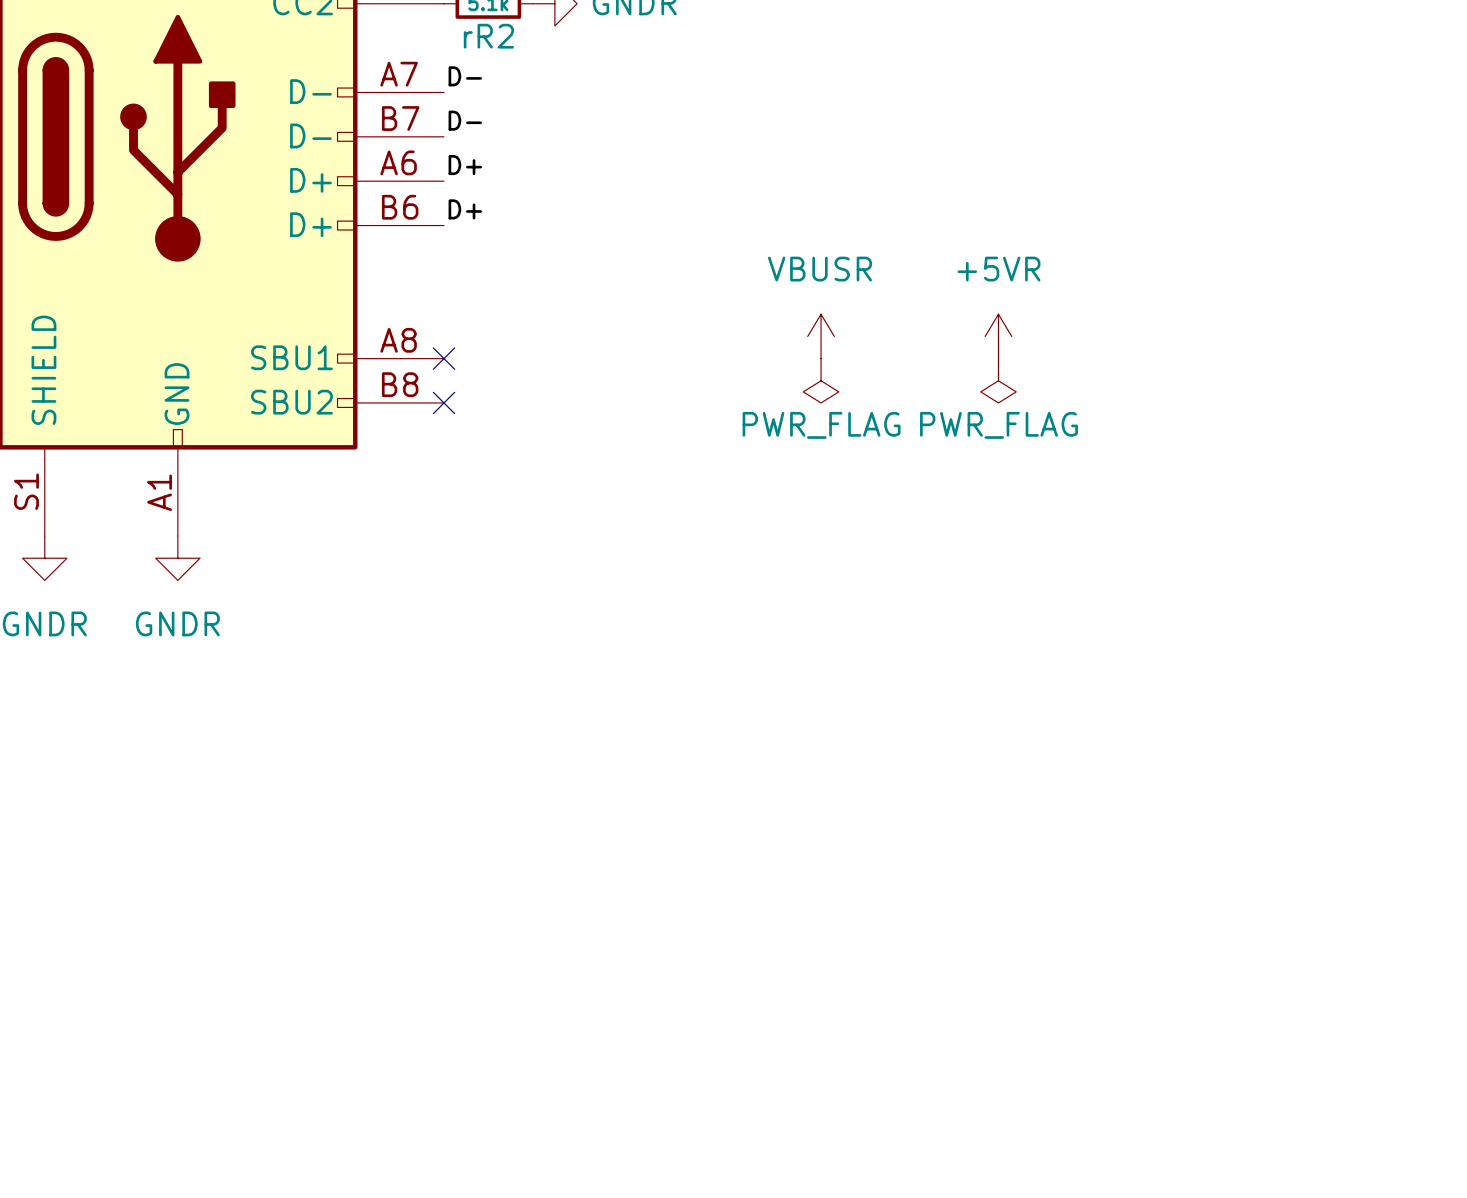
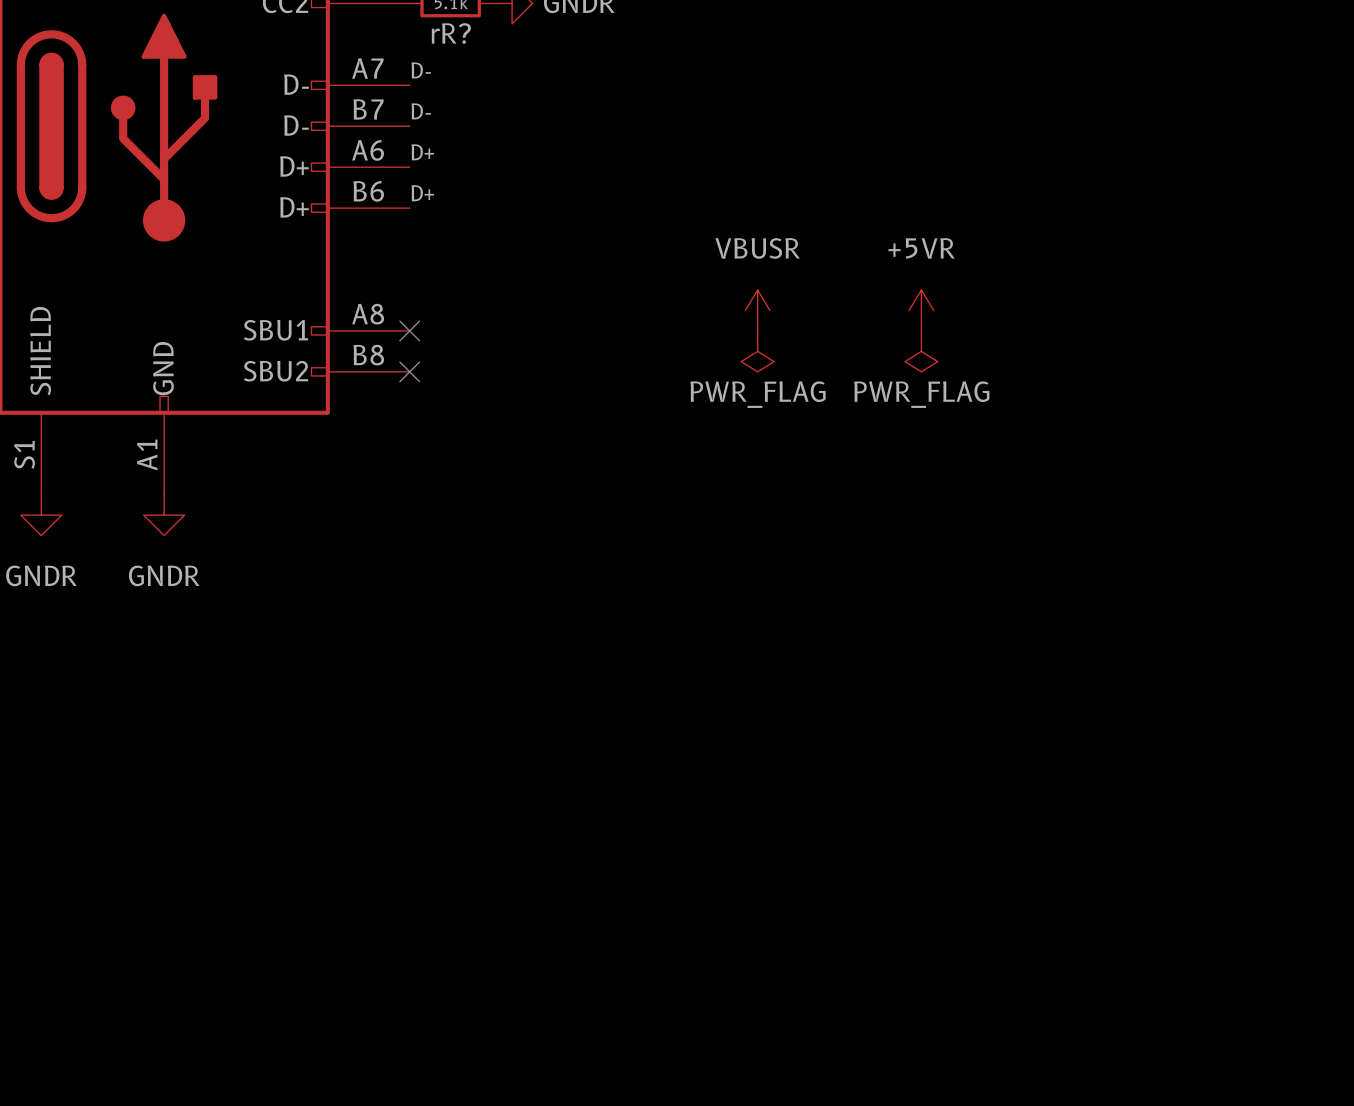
rR2 name: rR2 (488, 36) -> rR? (451, 33)

